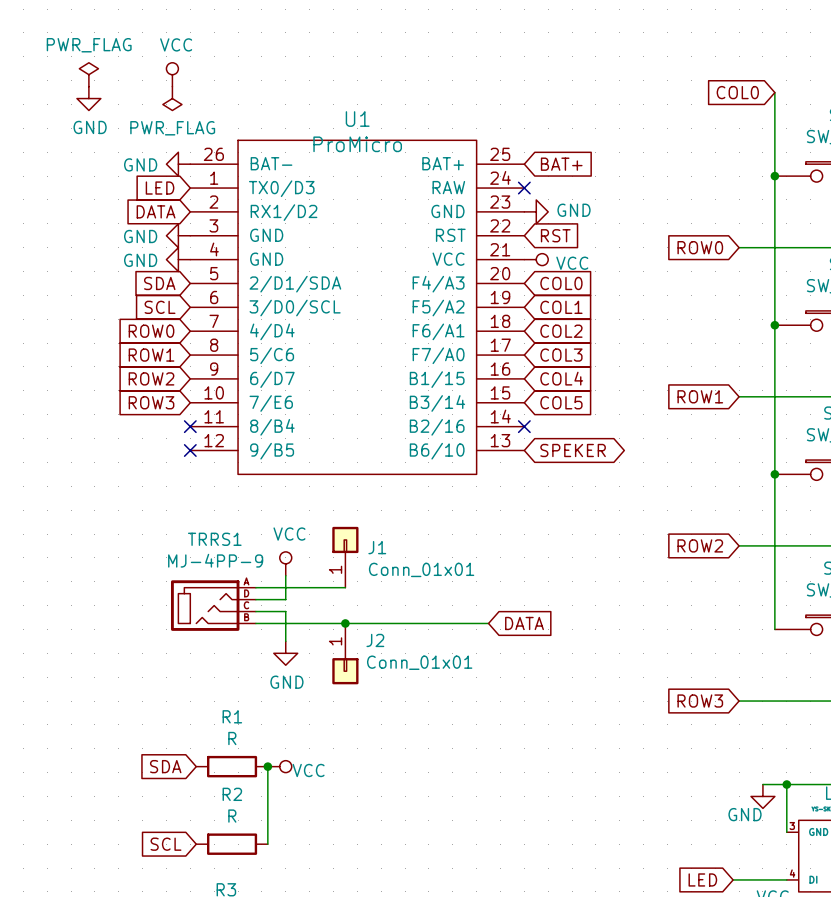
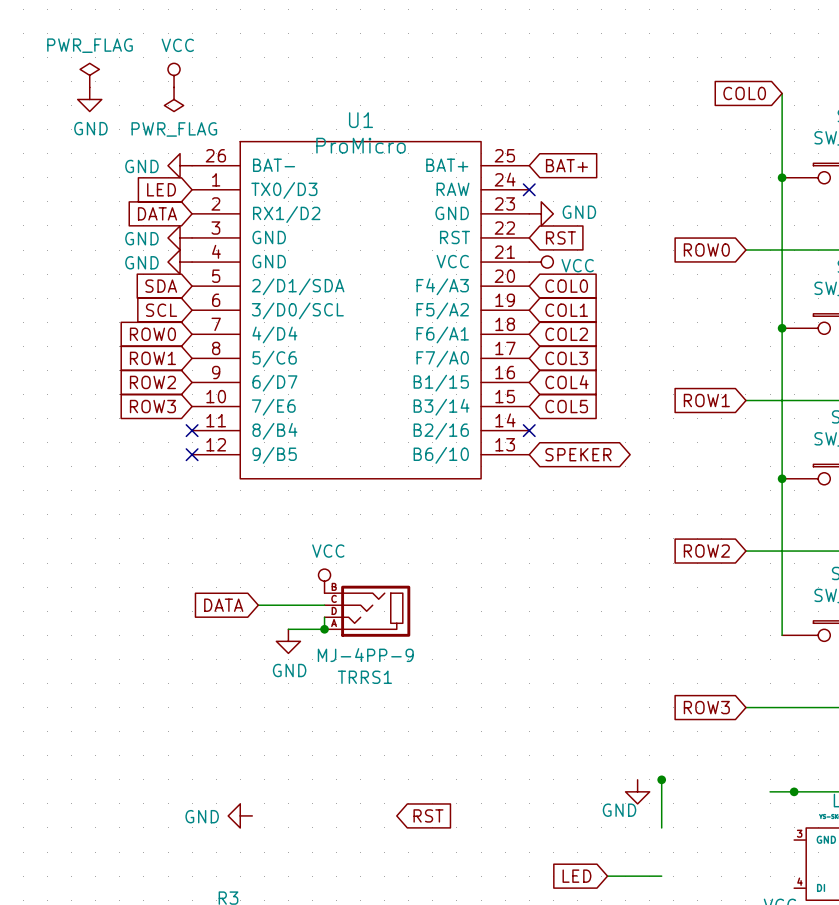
J1: Conn_01x01 (345, 557) -> none
power symbol position: VCC (285, 563) -> VCC (324, 581)
wire: (285, 575) (285, 599) -> (324, 605) (288, 605)
wire: (255, 587) (345, 587) -> none
TRRS1 rotation: 0° (205, 605) -> 180° (375, 611)
TRRS1 position: (213, 605) -> (367, 611)
wire: (255, 611) (285, 611) (285, 641) -> none
wire: (255, 623) (285, 623) -> none
wire: (321, 623) (488, 623) -> (324, 629) (324, 617)
junction position: (345, 623) -> (324, 629)
global label rotation: 0° (524, 623) -> 180° (223, 605)
global label position: DATA (524, 623) -> DATA (223, 605)
power symbol position: GND (285, 653) -> GND (288, 641)
J2: Conn_01x01 (345, 653) -> none
global label: SDA (165, 766) -> none
R1: R (232, 766) -> none
wire: (267, 766) (267, 844) -> none
junction: (267, 766) -> none
power symbol: VCC (279, 766) -> none
junction: none -> (661, 779)
power symbol: none -> GND (637, 791)
wire: (786, 784) (786, 832) -> (661, 779) (661, 827)
power symbol: GND (762, 796) -> none
power symbol: none -> GND (240, 815)
global label: none -> RST (428, 815)
global label: SCL (166, 844) -> none
R2: R (232, 844) -> none
global label position: LED (702, 879) -> LED (576, 876)
wire: (733, 879) (786, 879) -> (607, 876) (661, 876)

